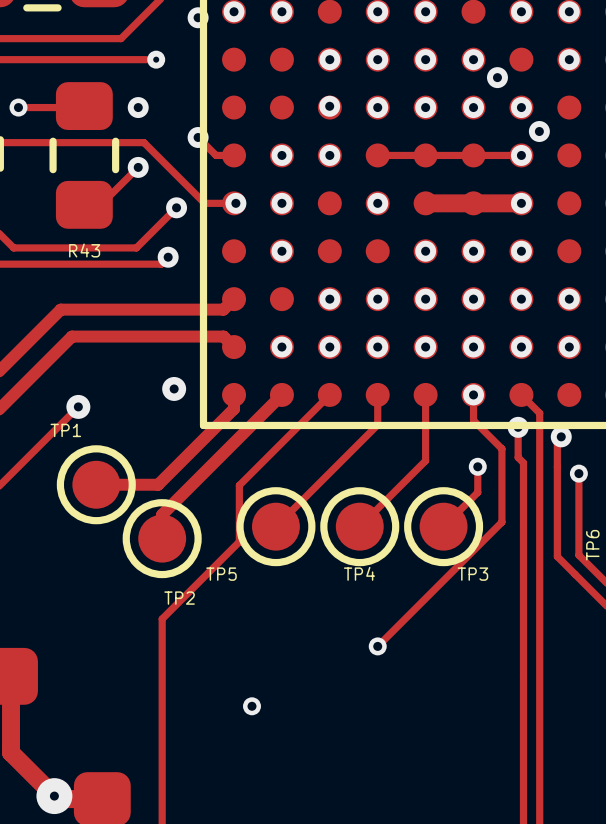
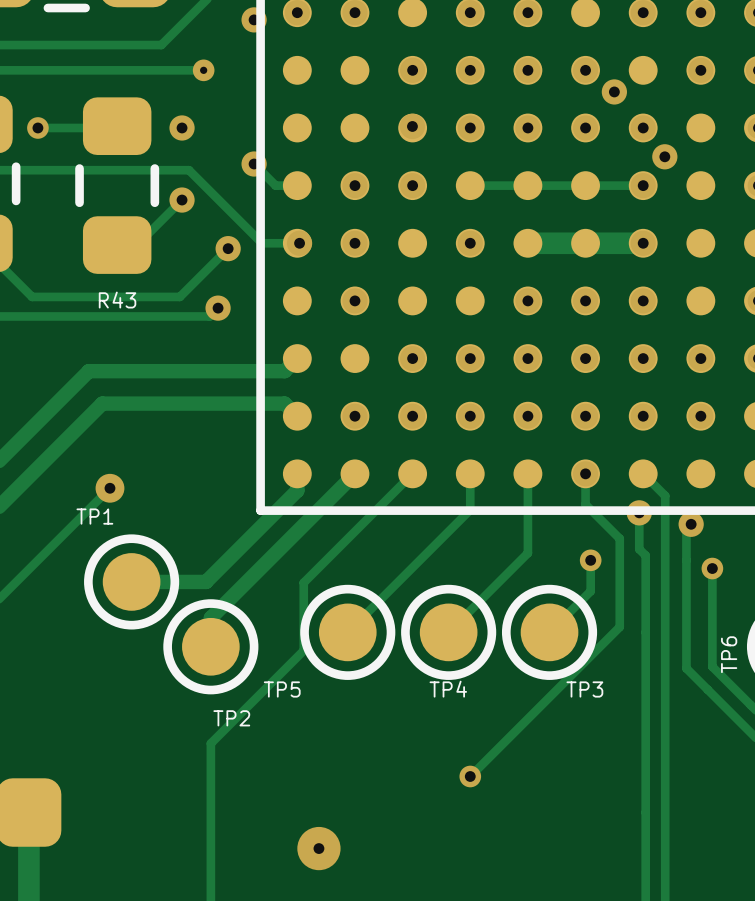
via: (174, 388) -> none
via size: [243, 697, 261, 716] -> [297, 826, 341, 871]

